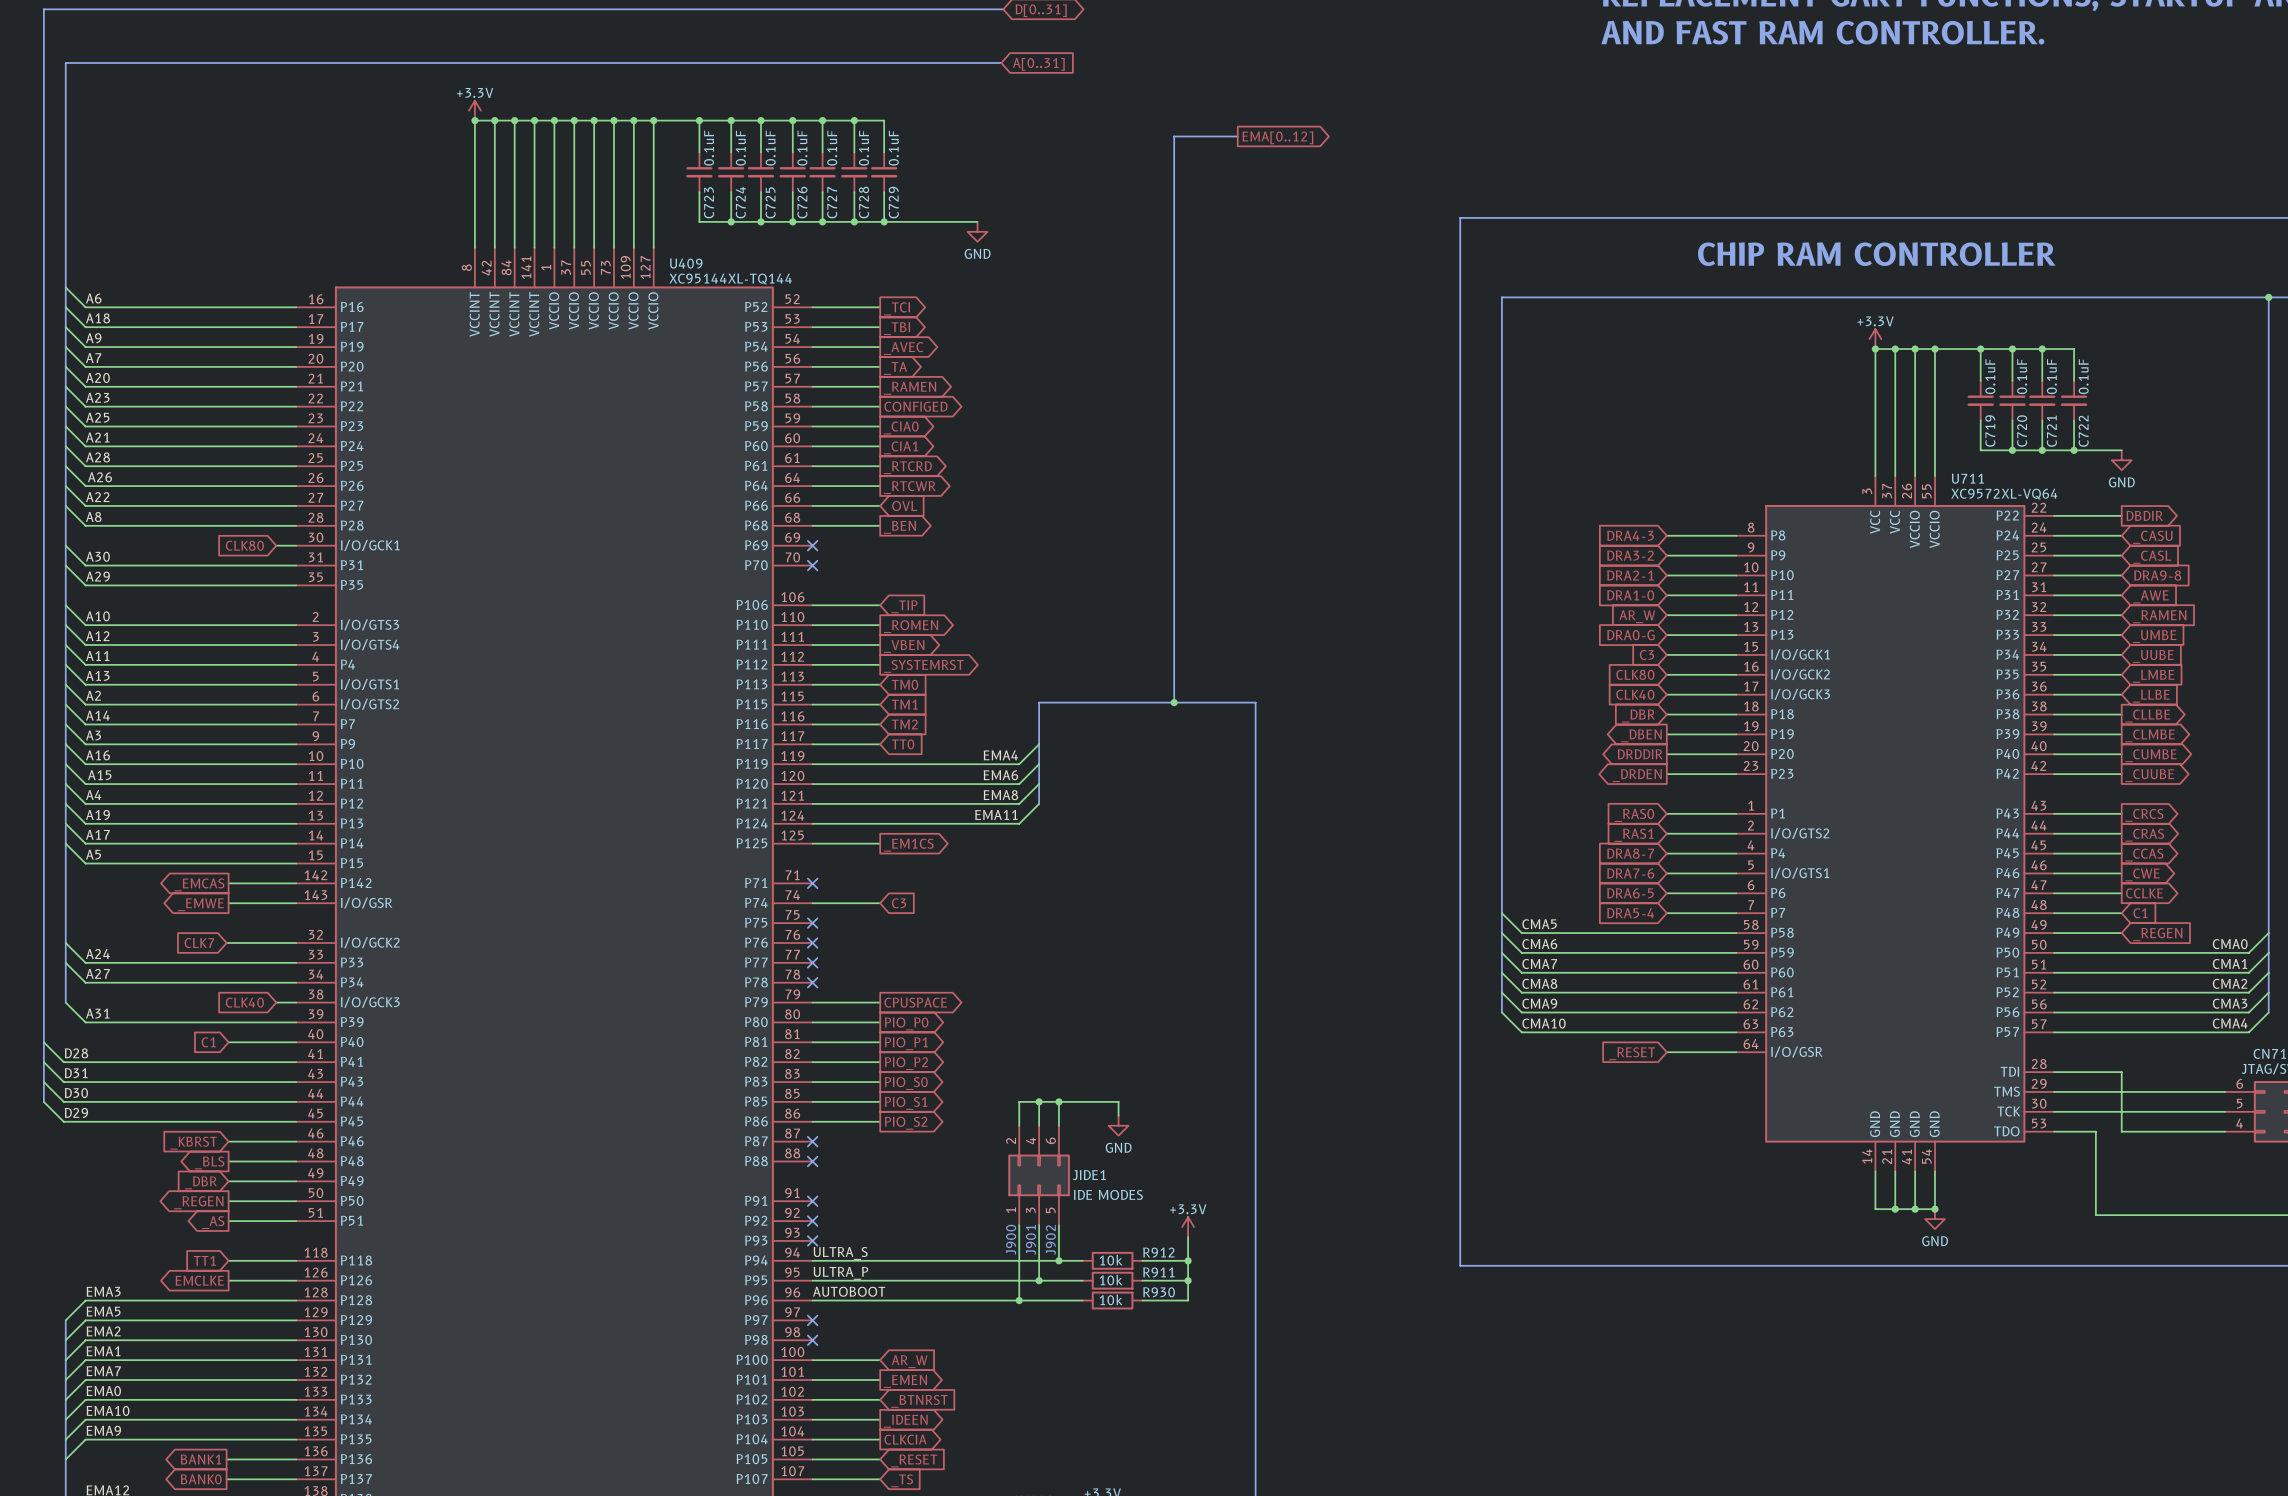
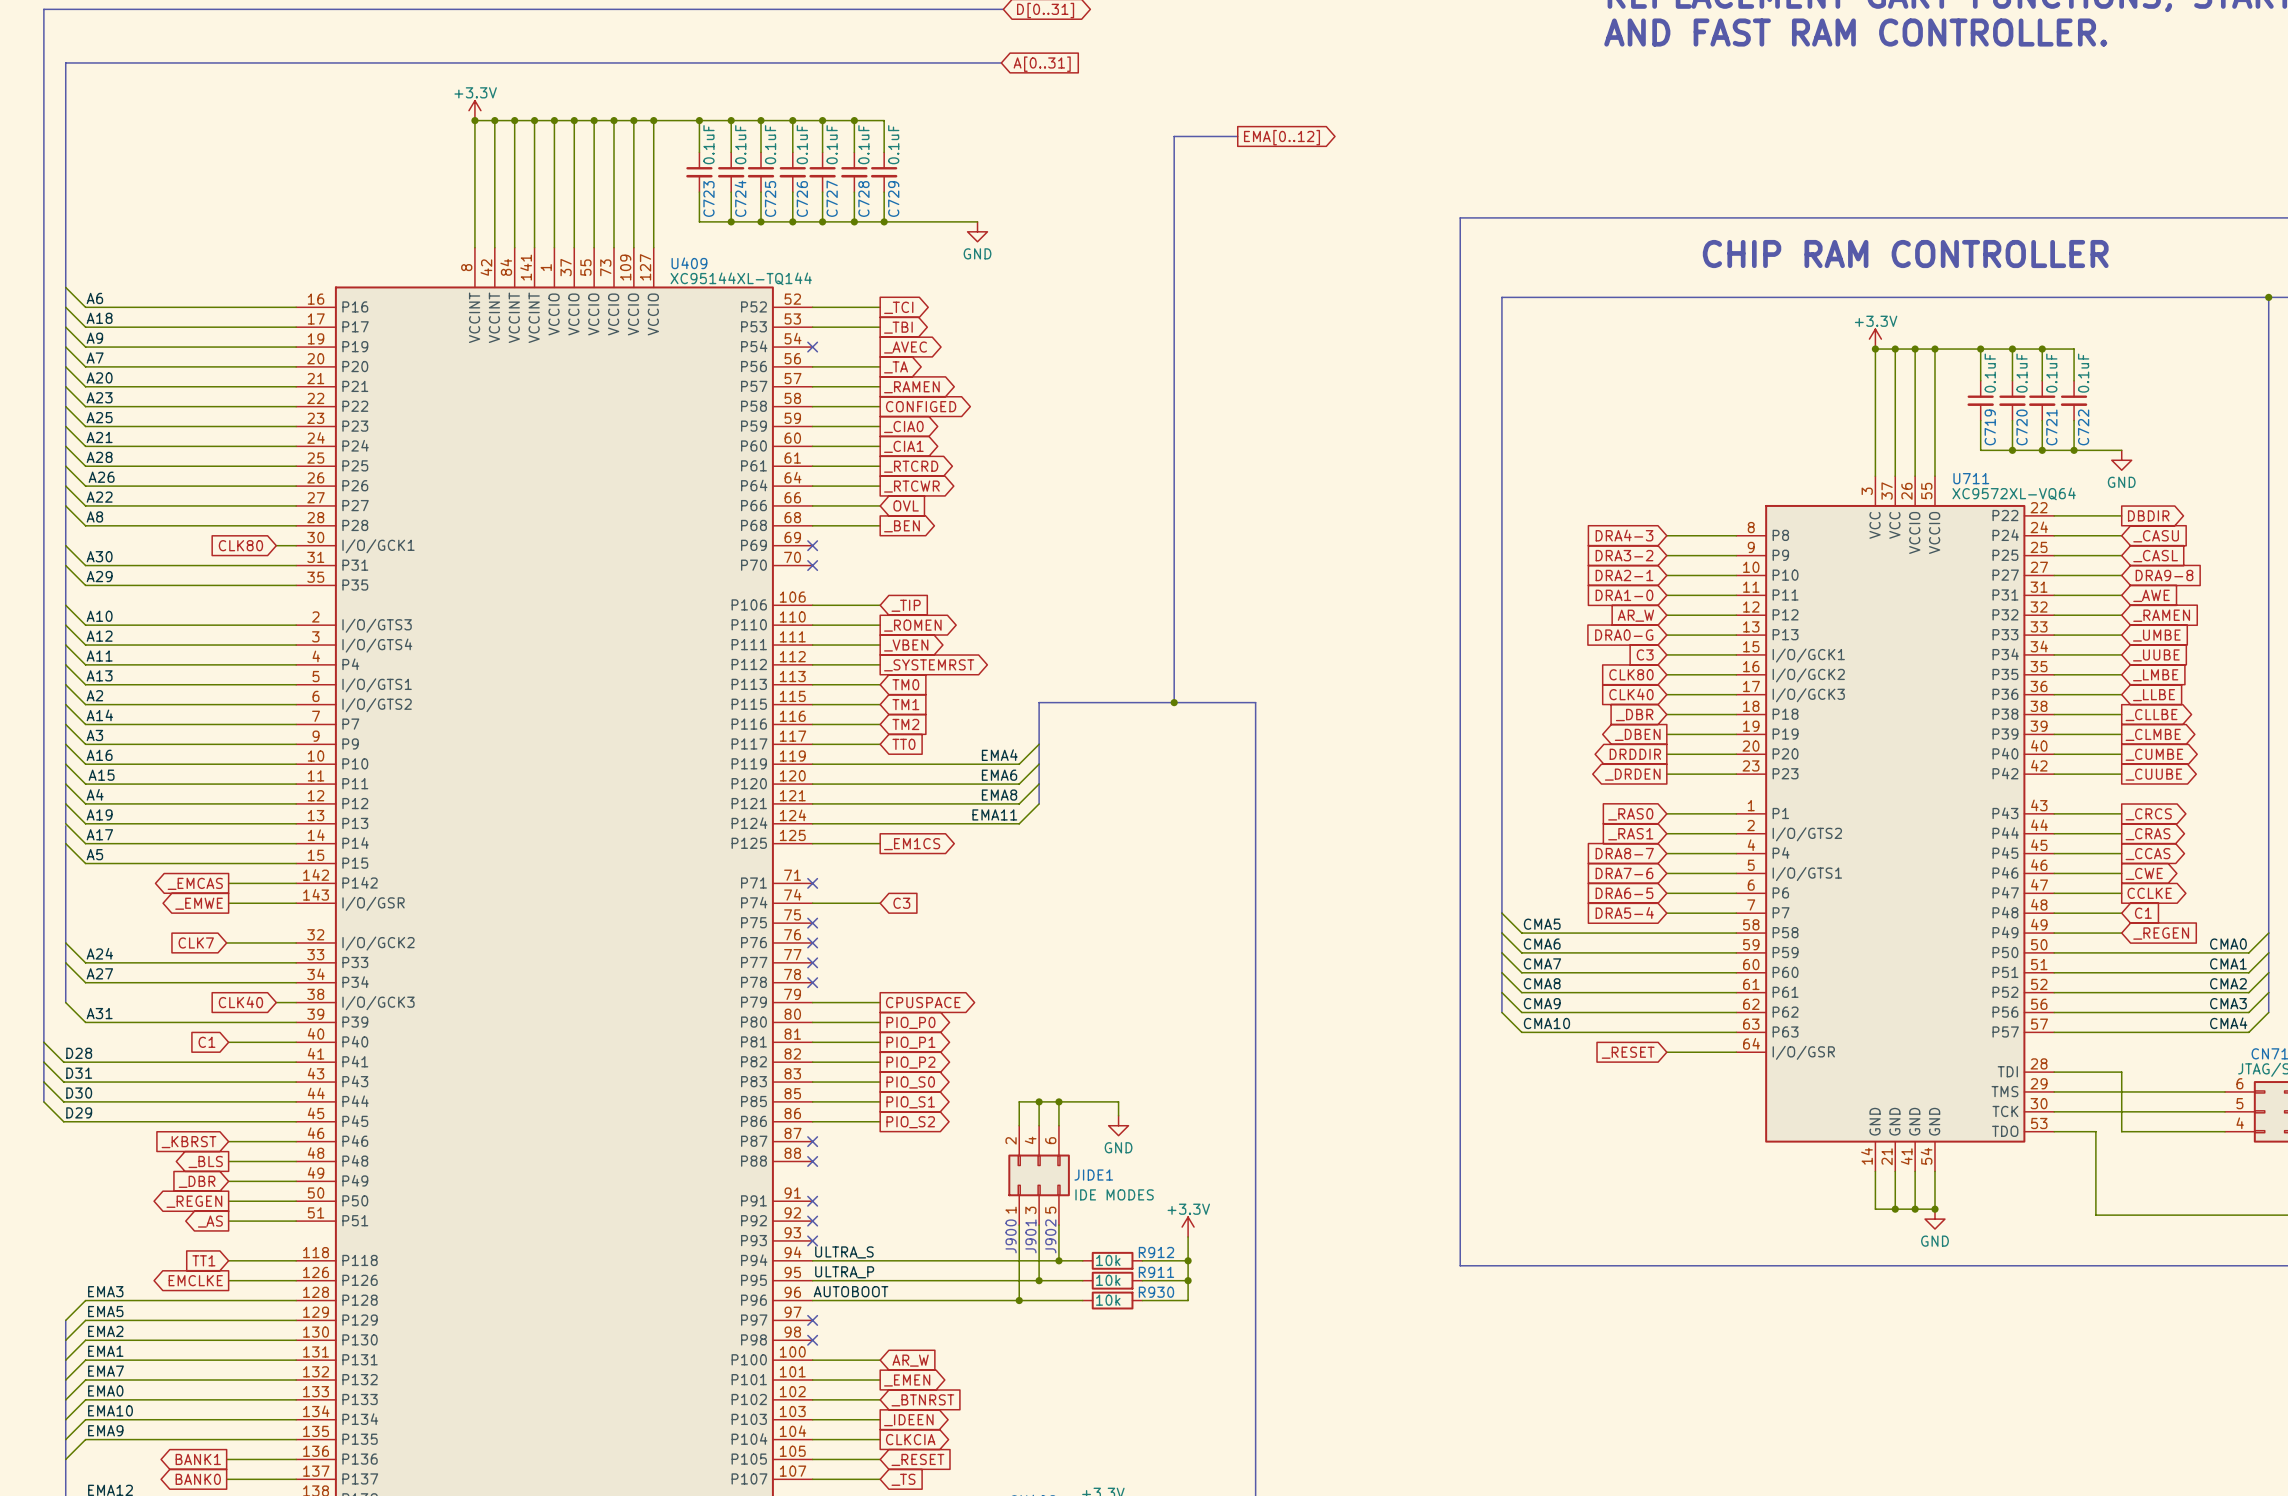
wire: (812, 347) (880, 347) -> none
no-connect mark: none -> (812, 347)

